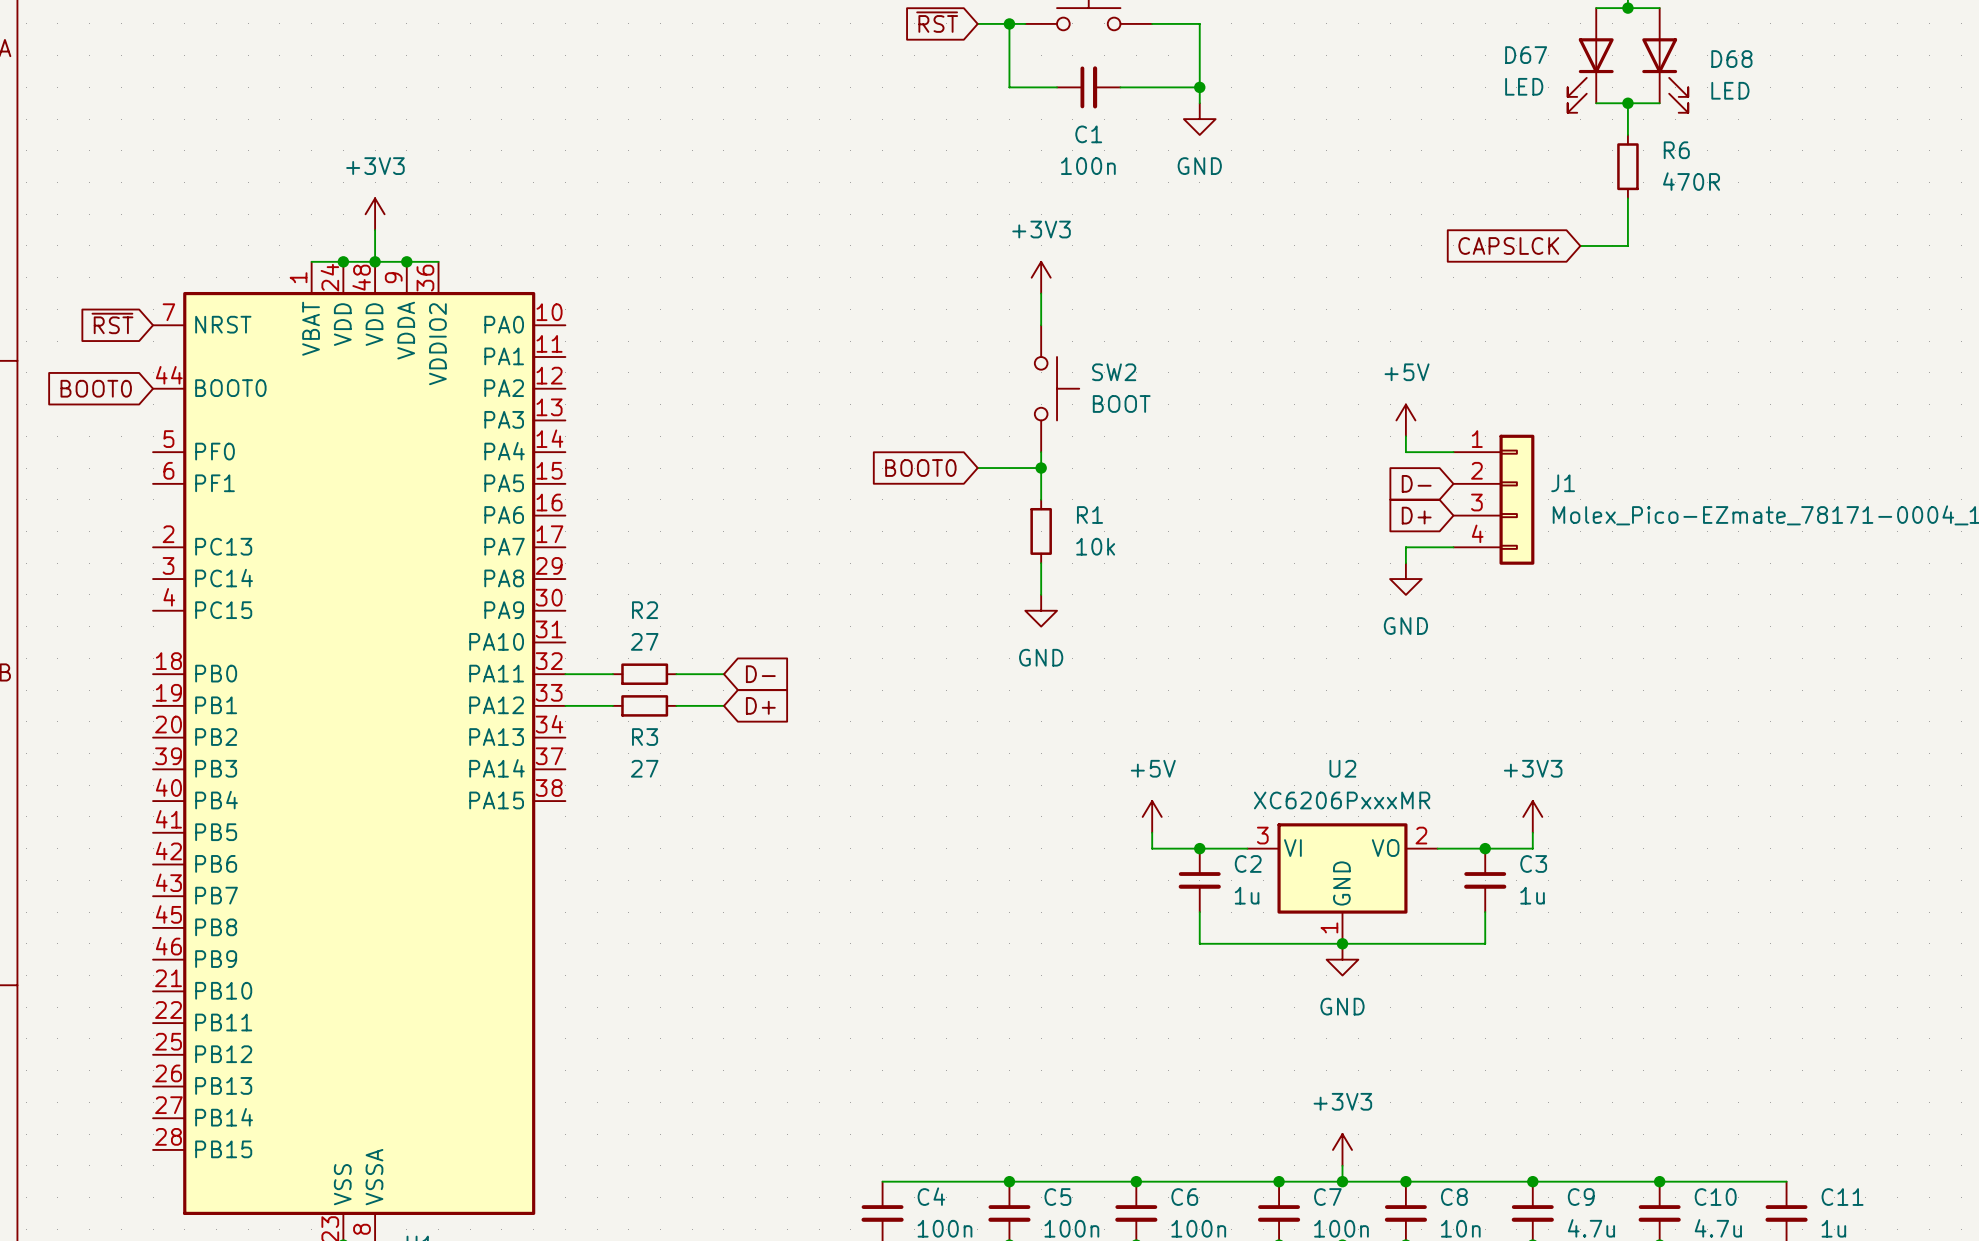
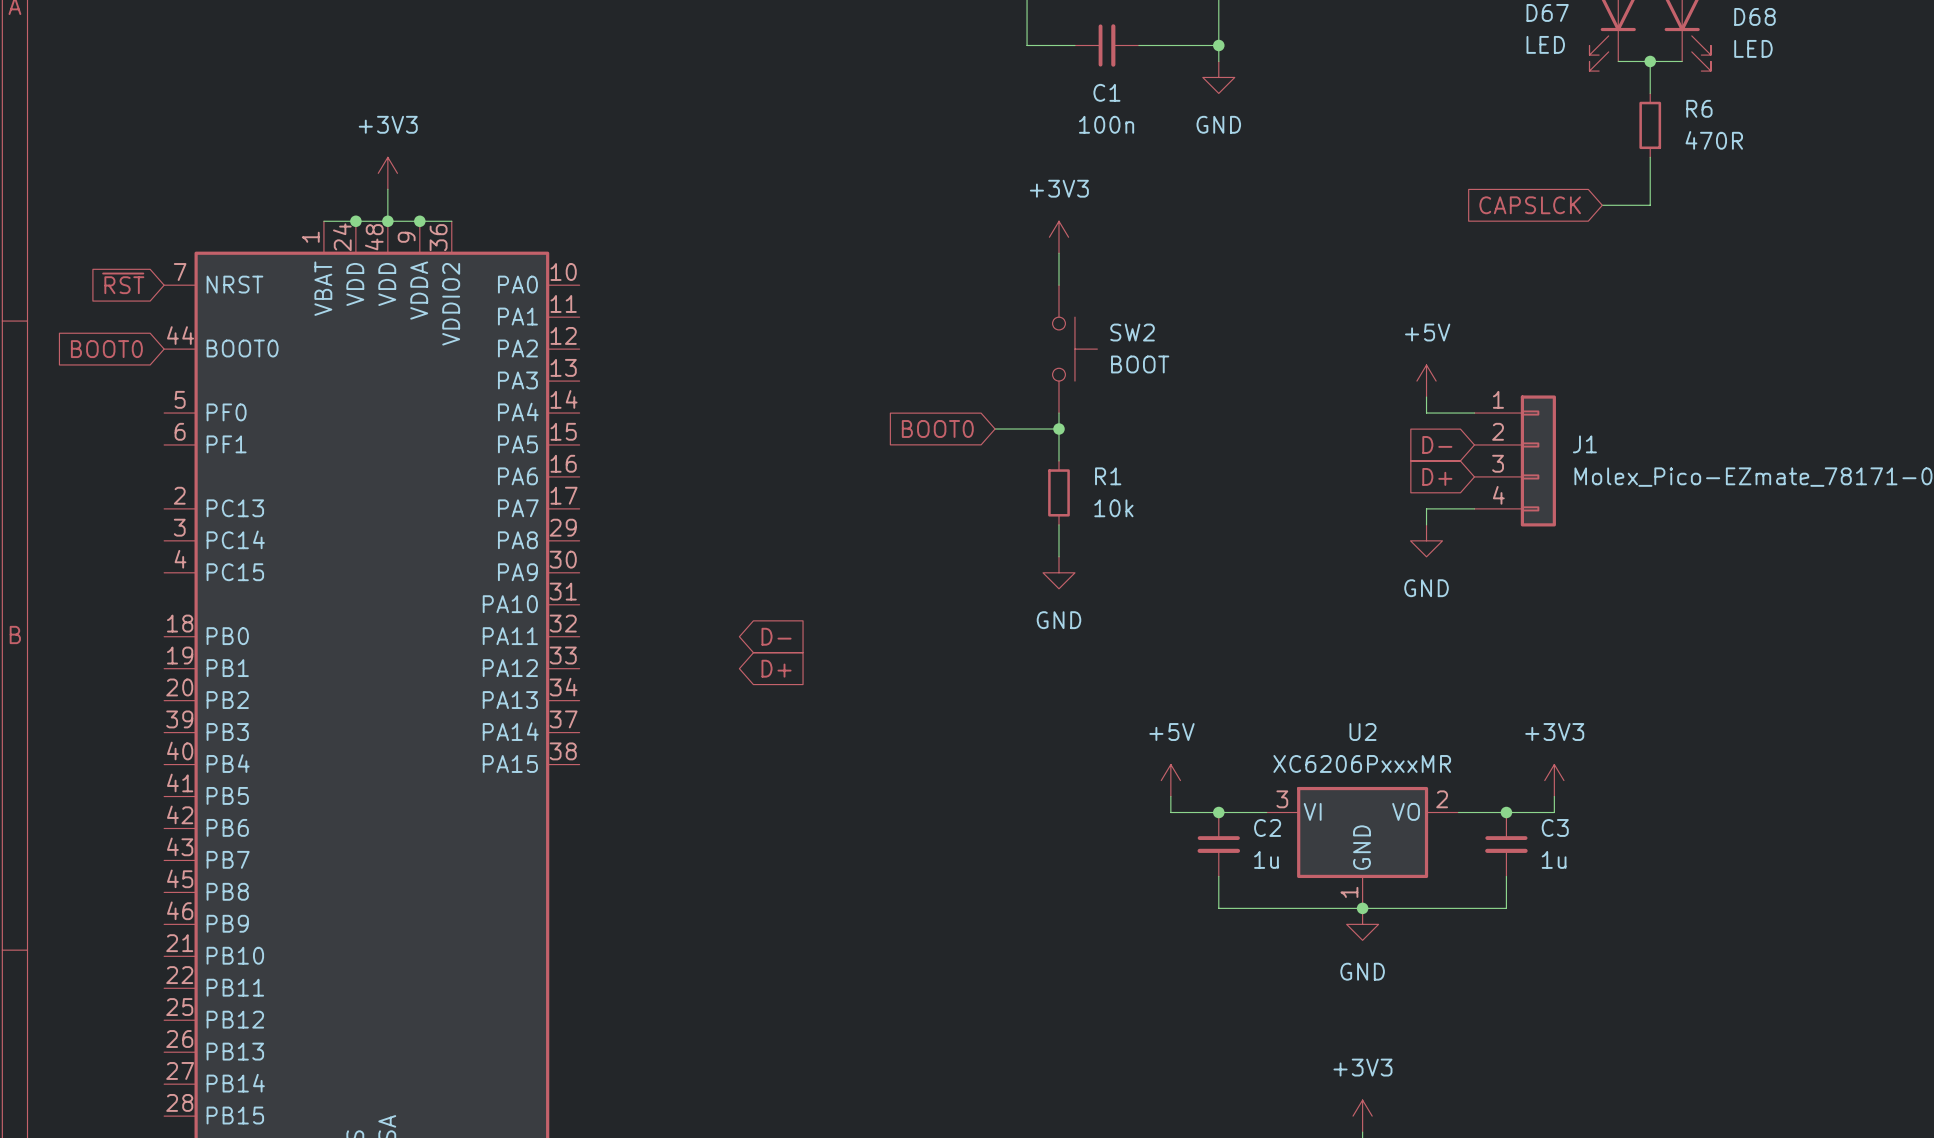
wire: (565, 674) (612, 674) -> none
R2: 27 (644, 674) -> none
wire: (676, 674) (723, 674) -> none
wire: (565, 705) (612, 705) -> none
R3: 27 (644, 705) -> none
wire: (676, 705) (723, 705) -> none

